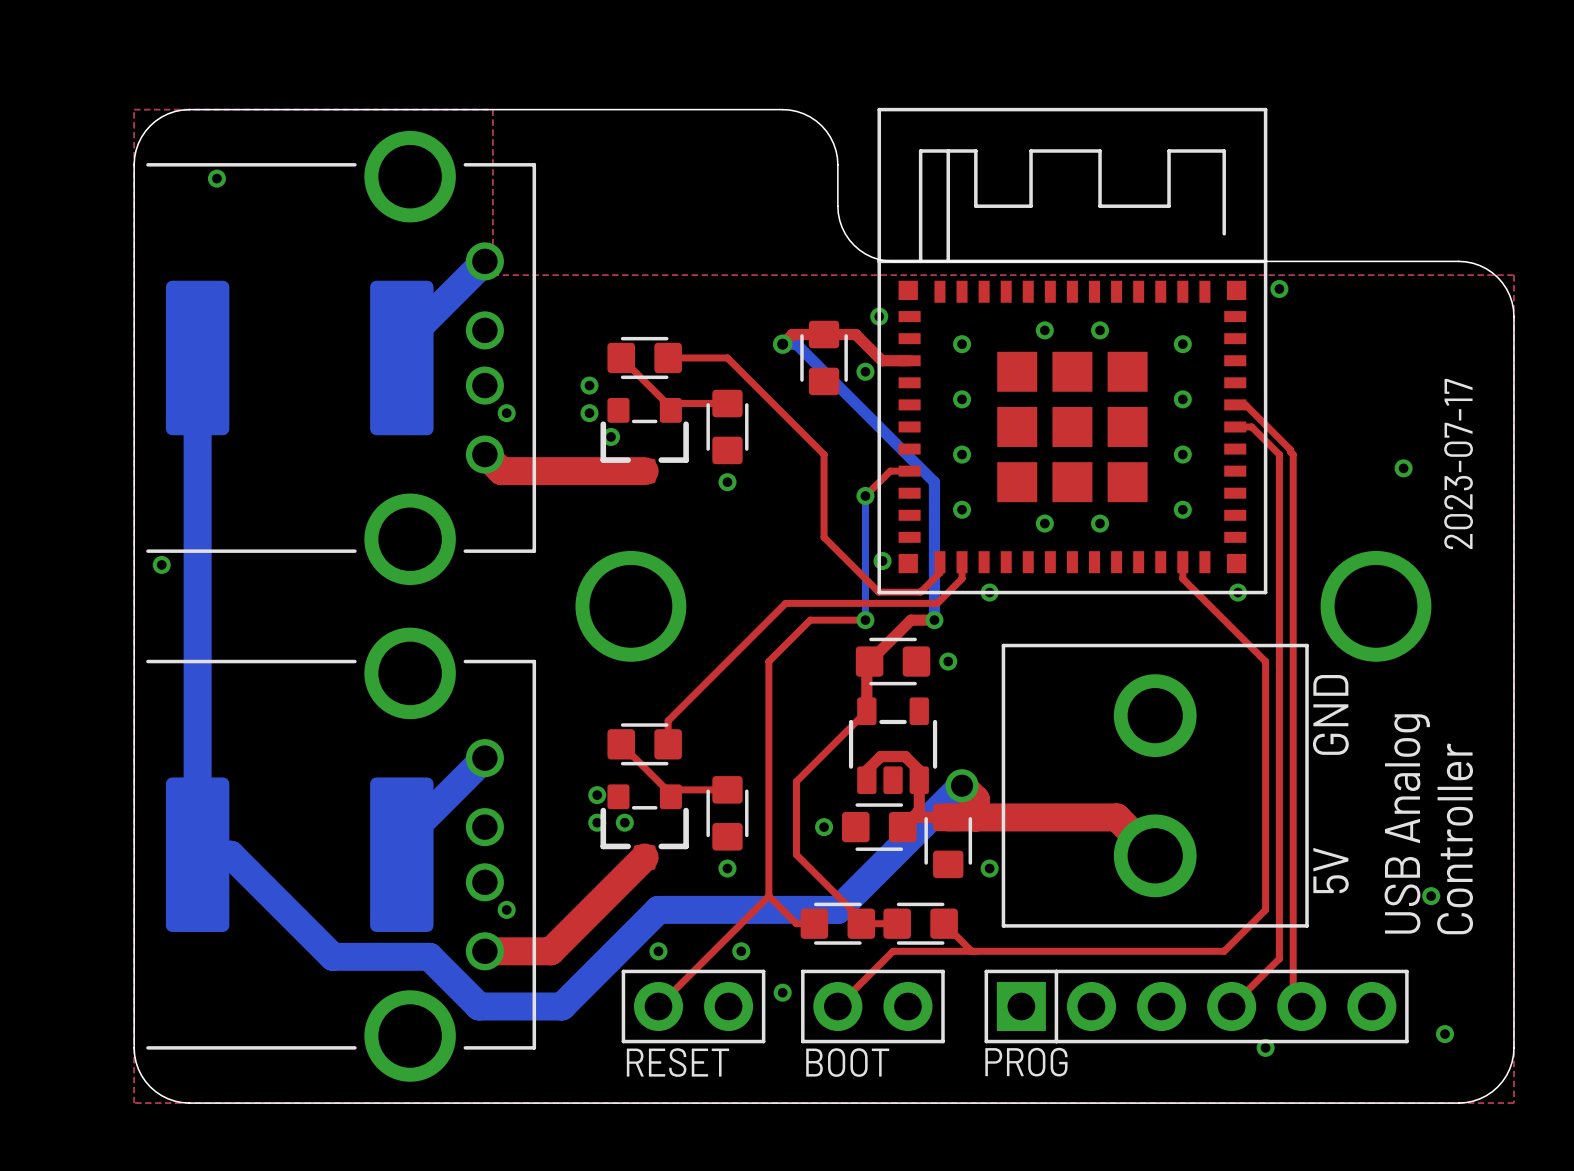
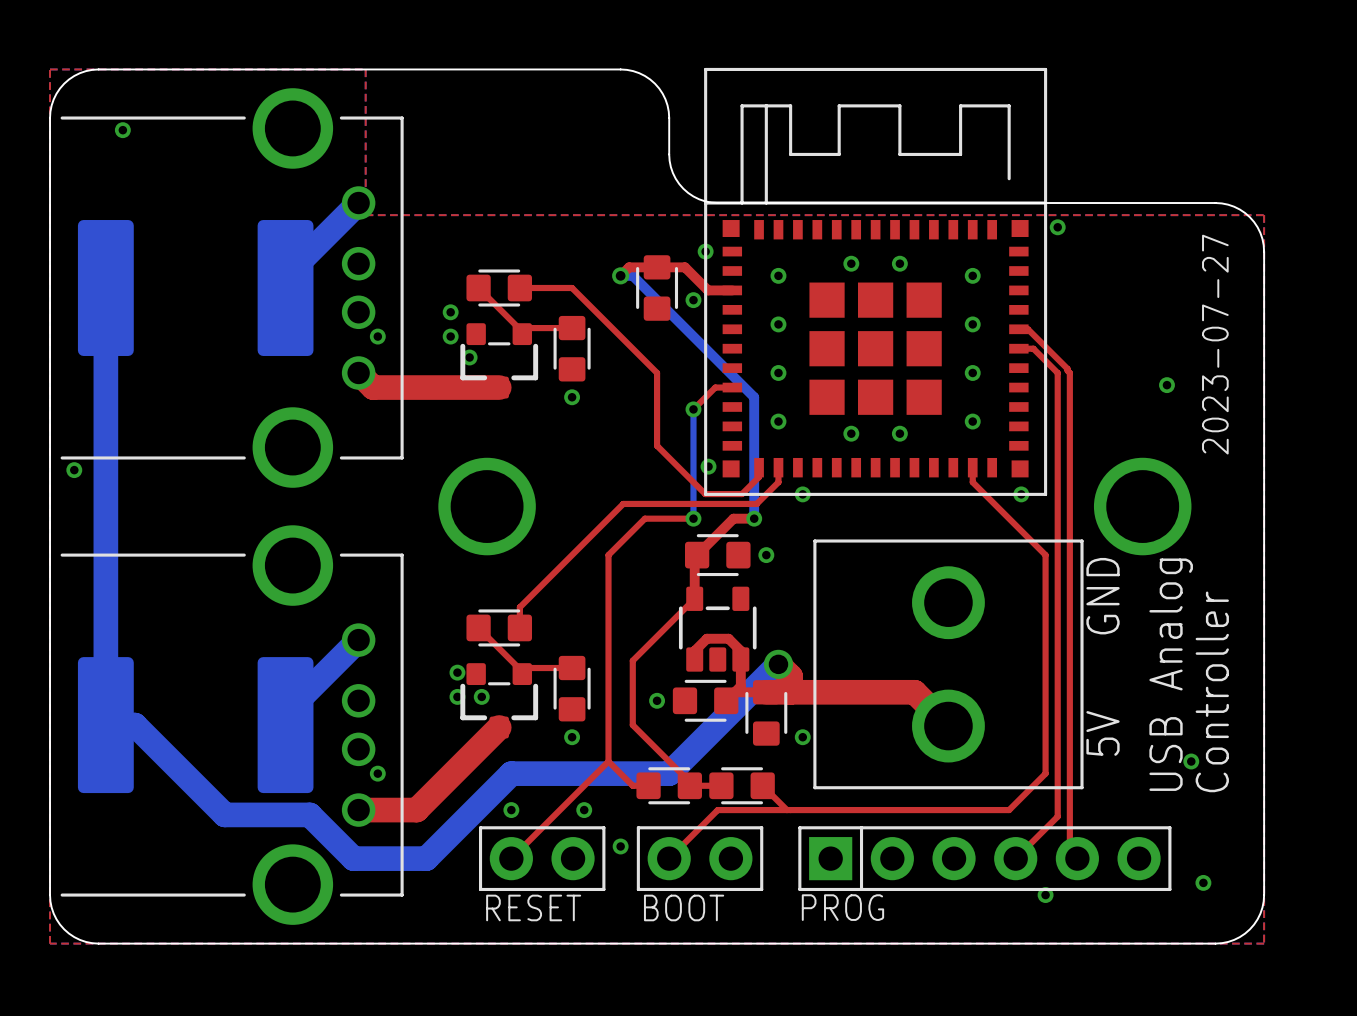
text: 2023-07-17 (1458, 463) -> 2023-07-27 (1215, 344)

